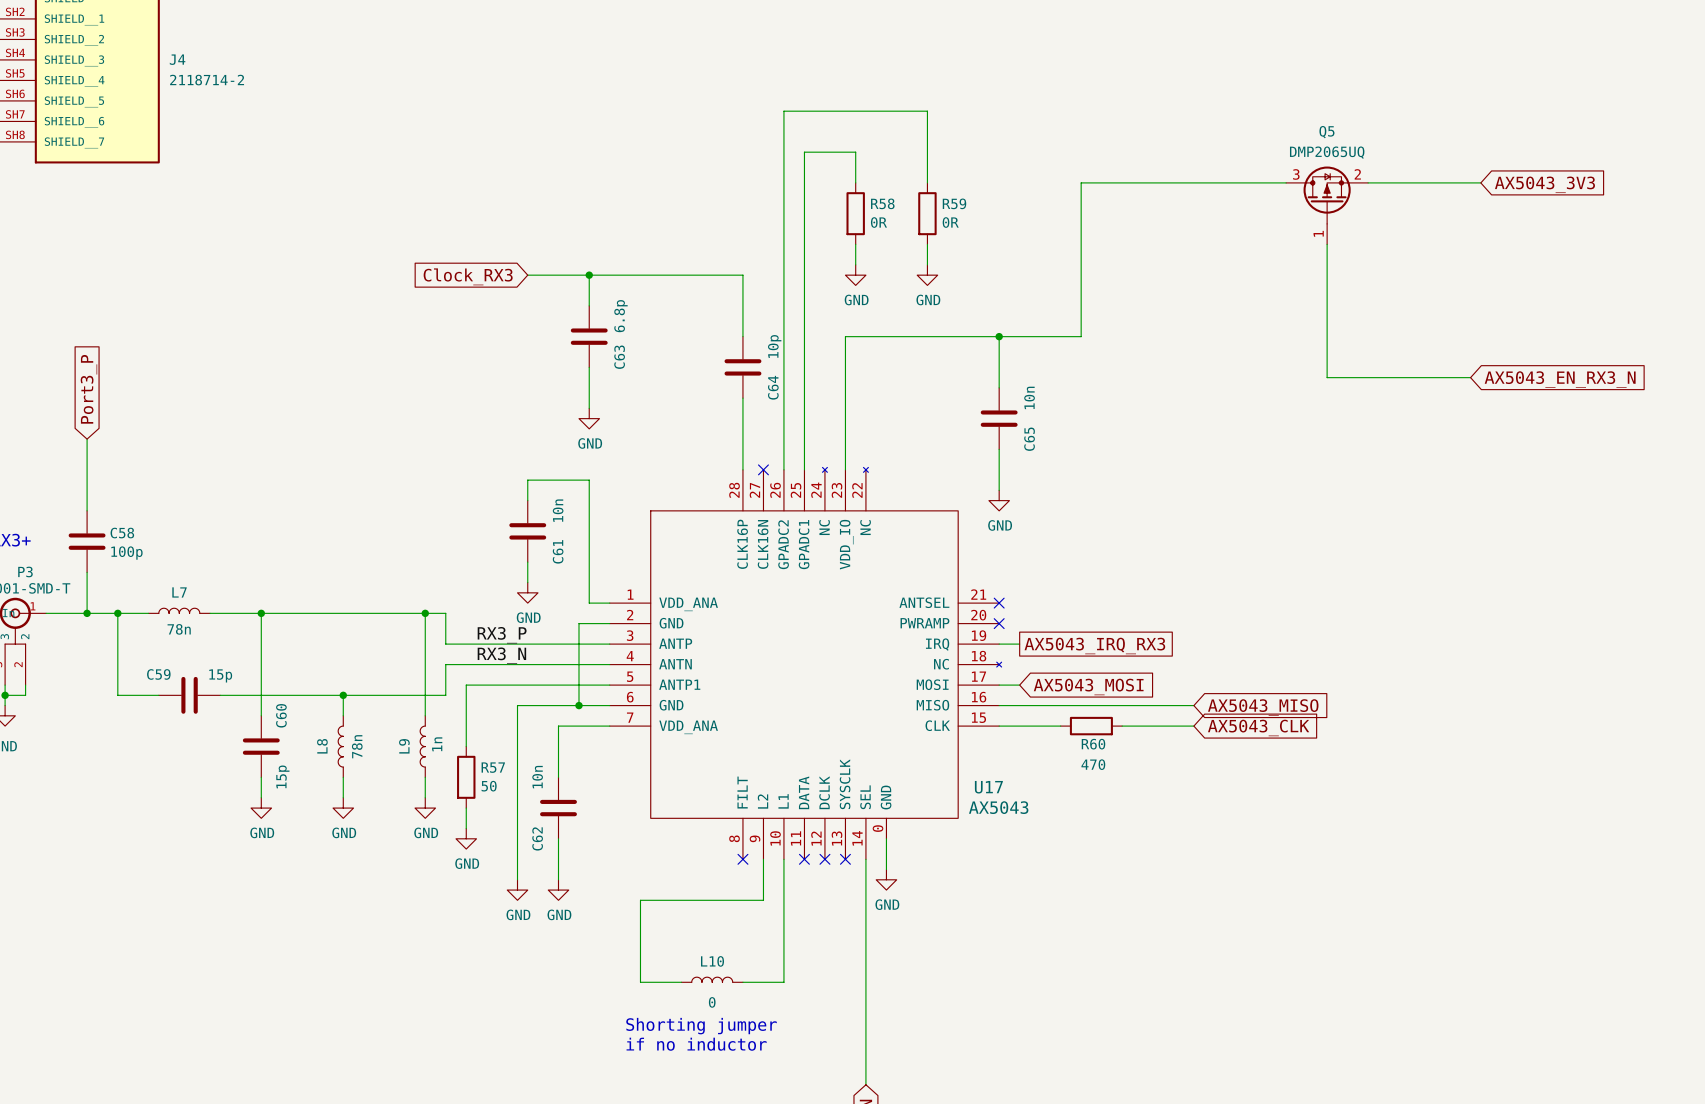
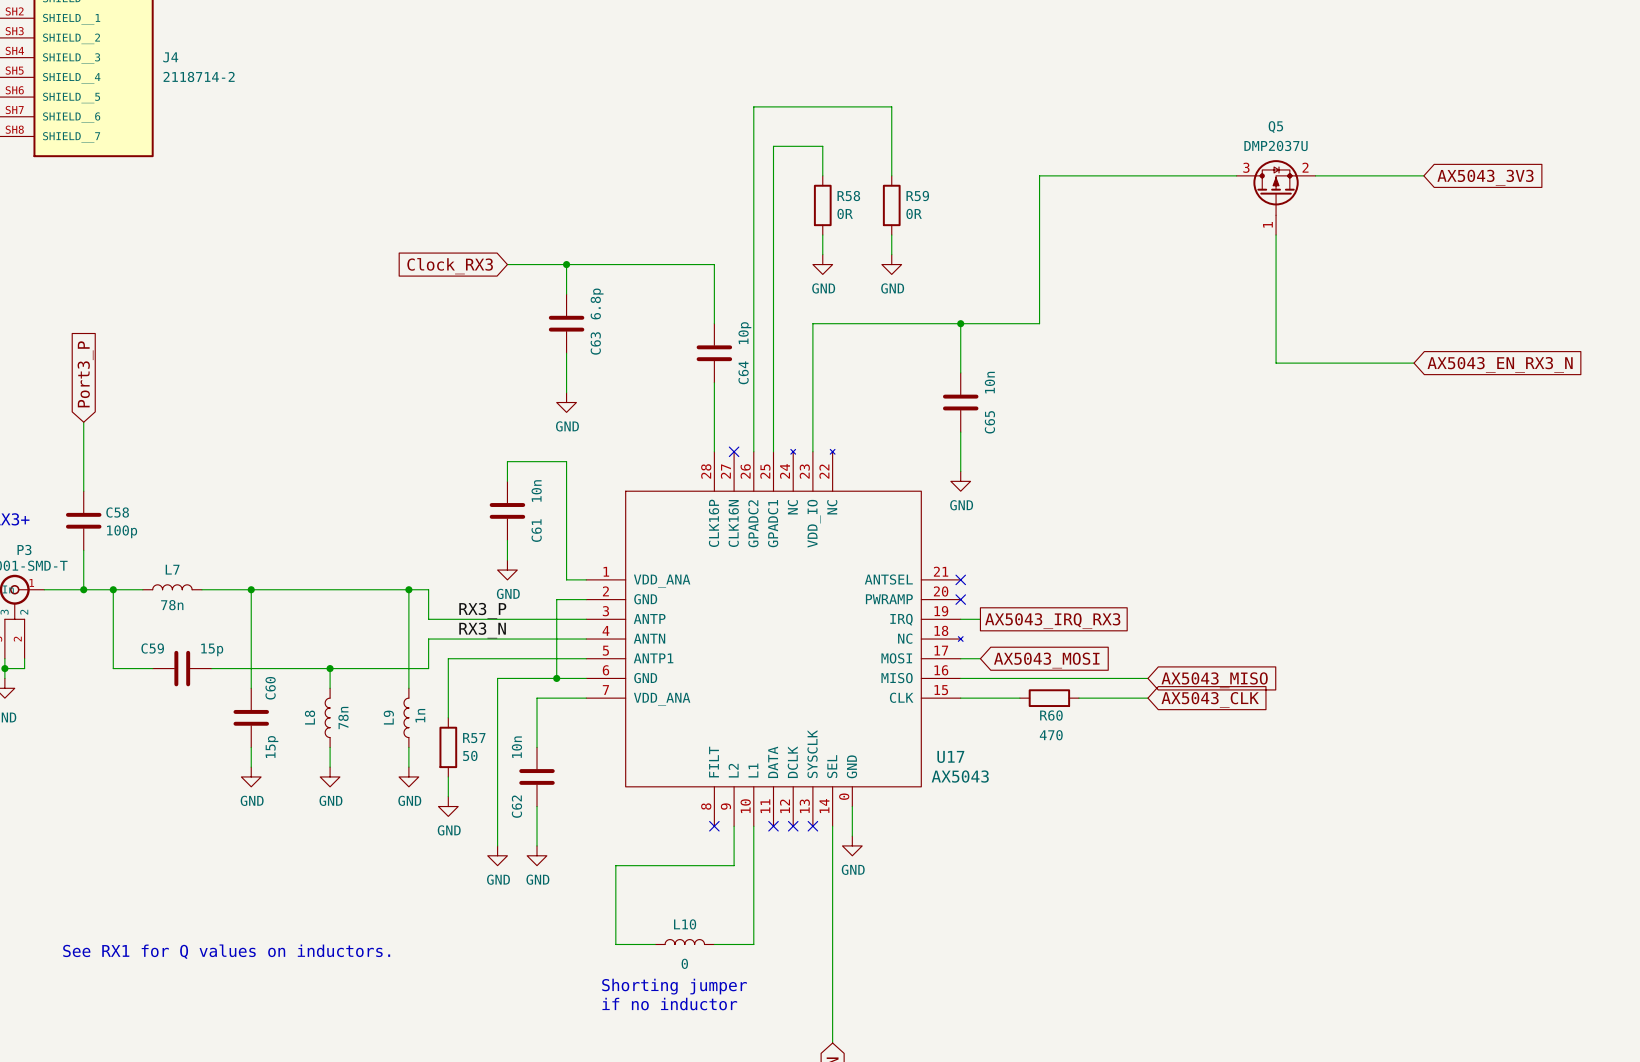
Q5 value: DMP2065UQ (1327, 152) -> DMP2037U (1276, 145)
text: none -> See RX1 for Q values on inductors. (226, 951)

